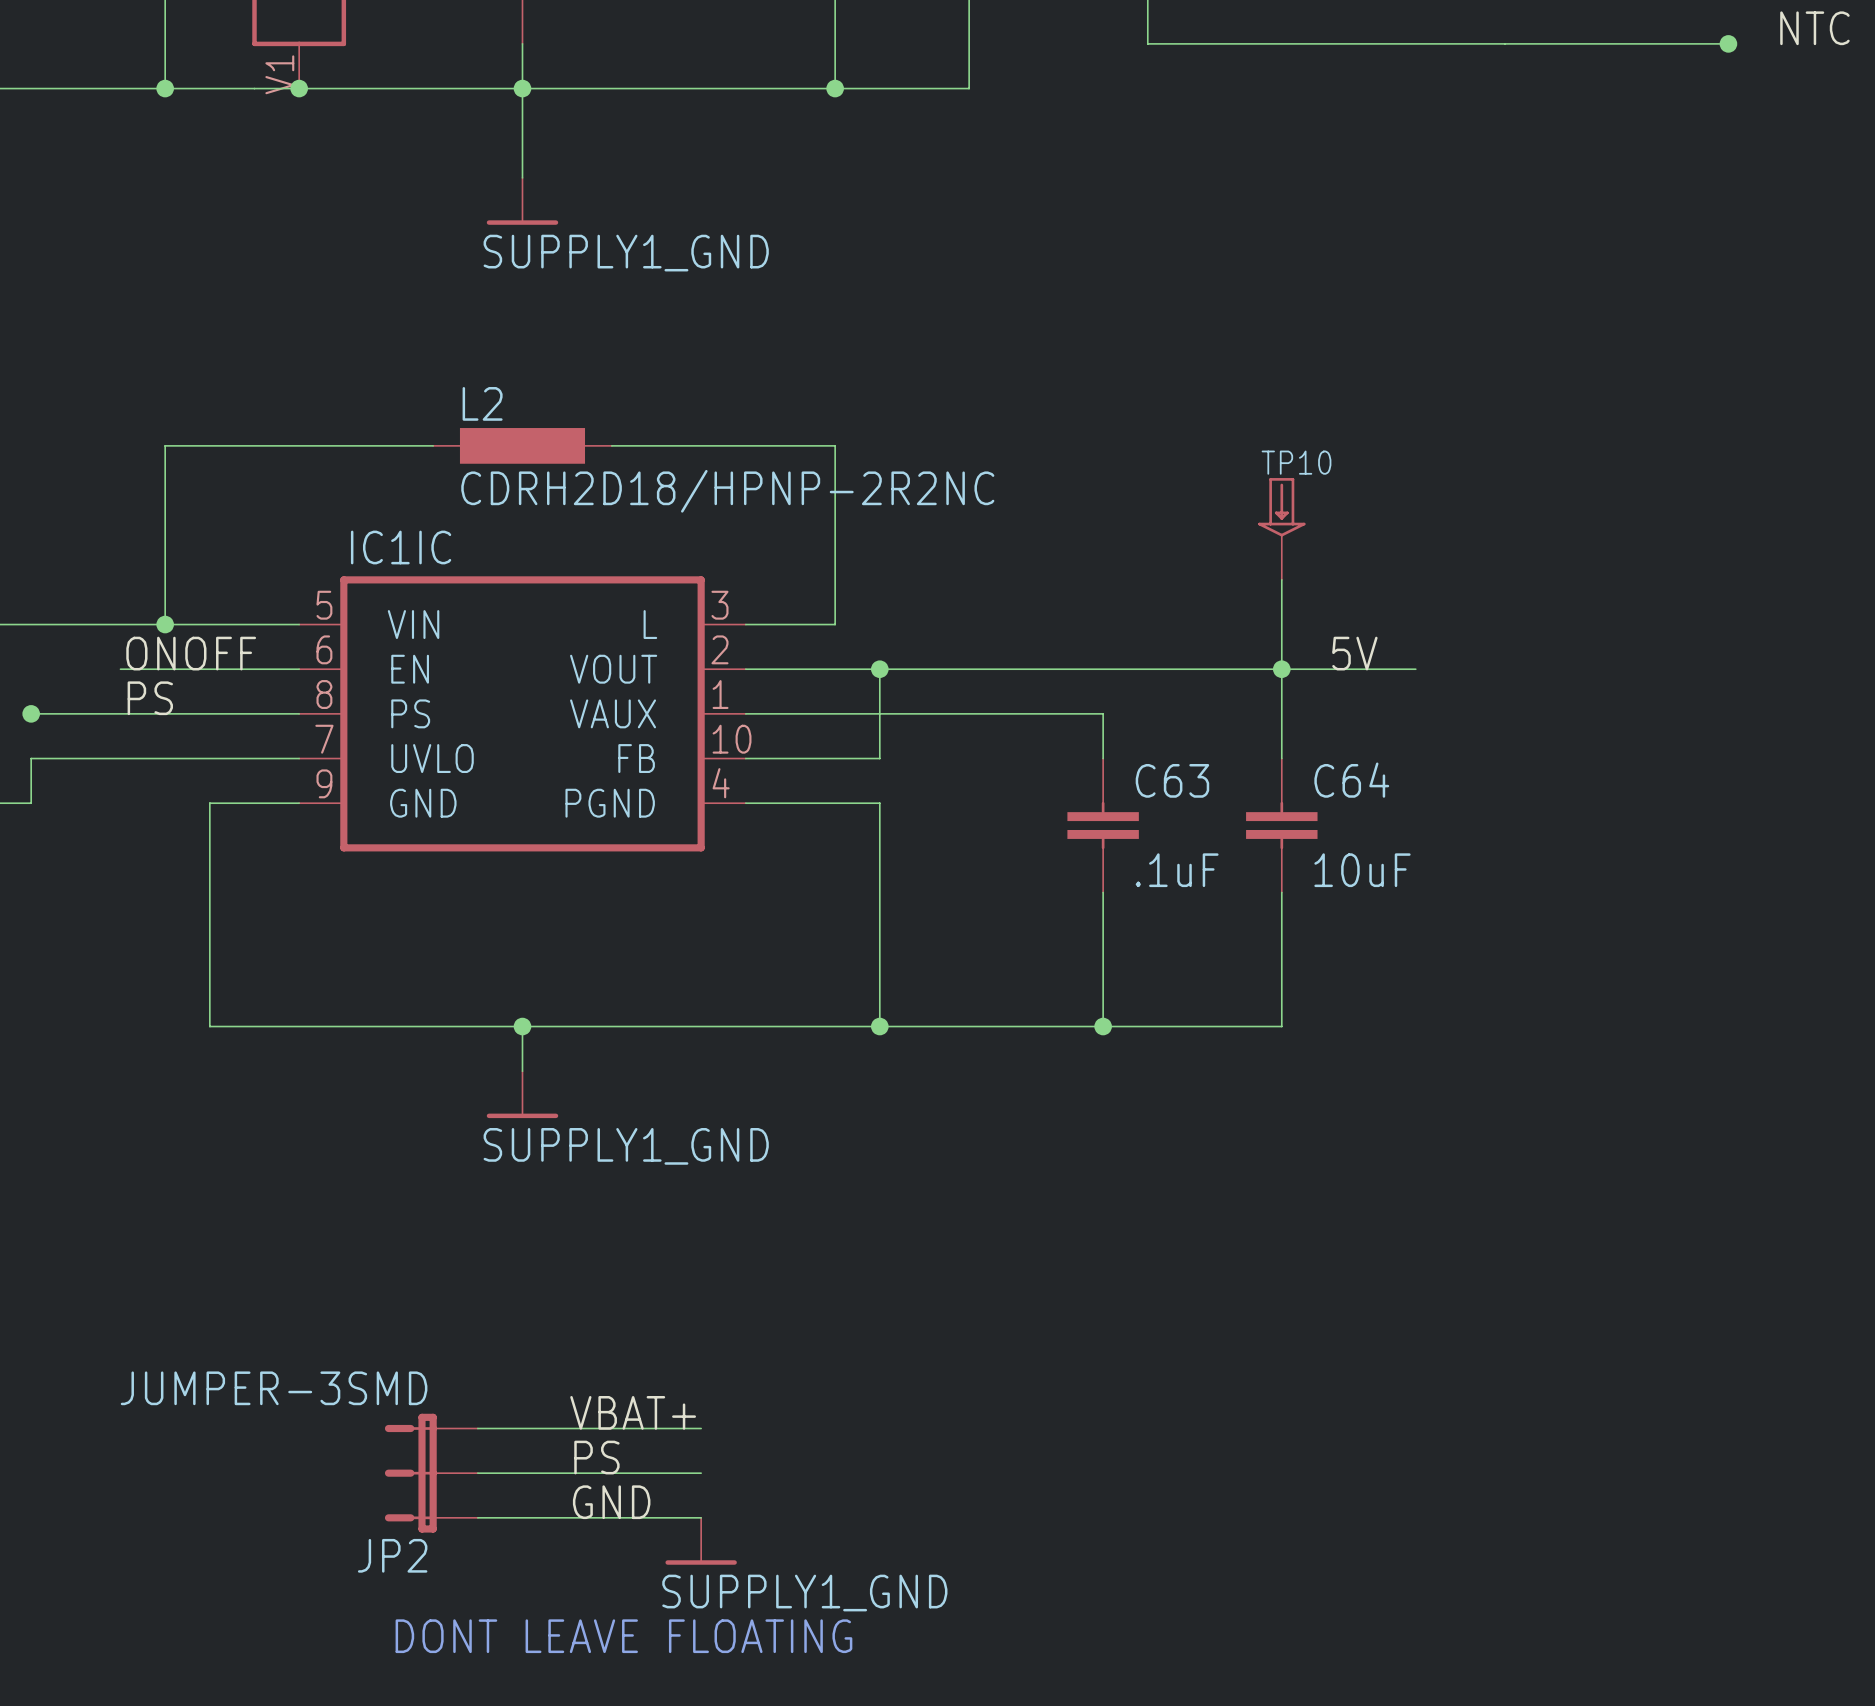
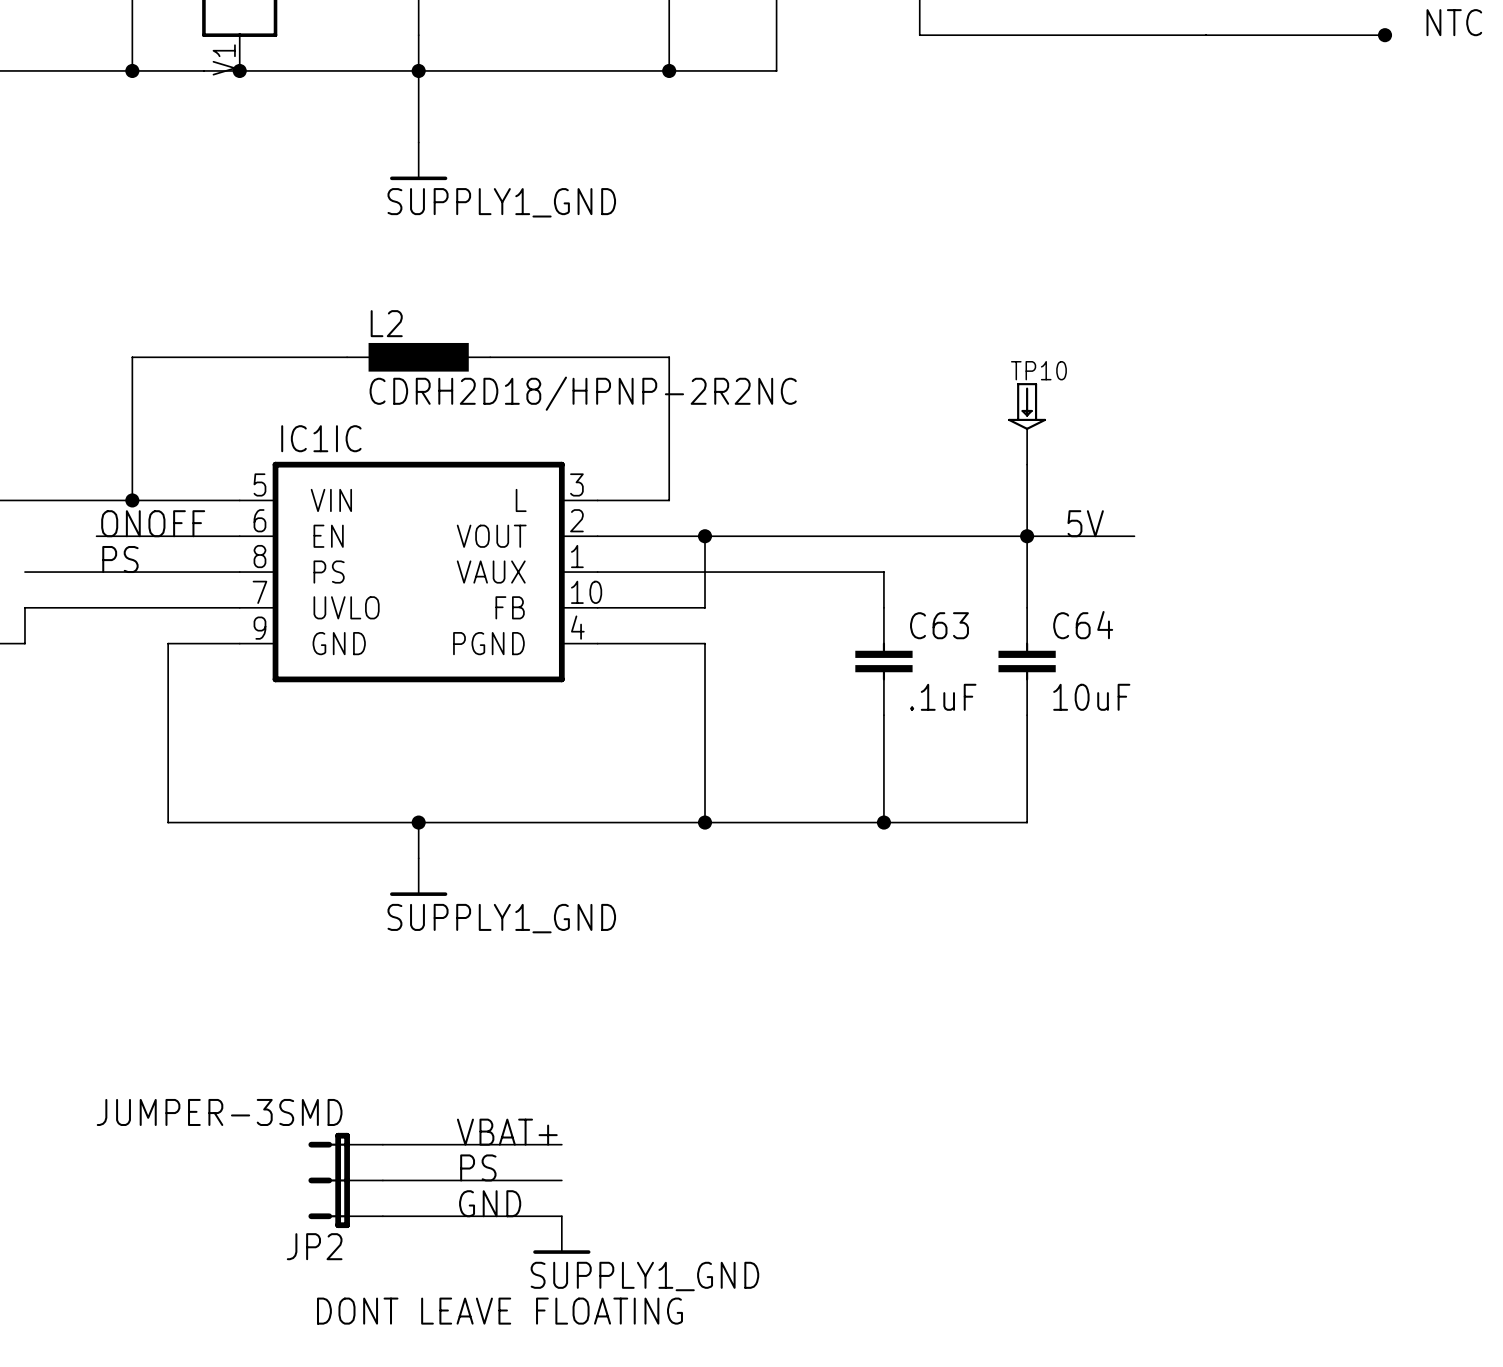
junction: (31, 713) -> none

